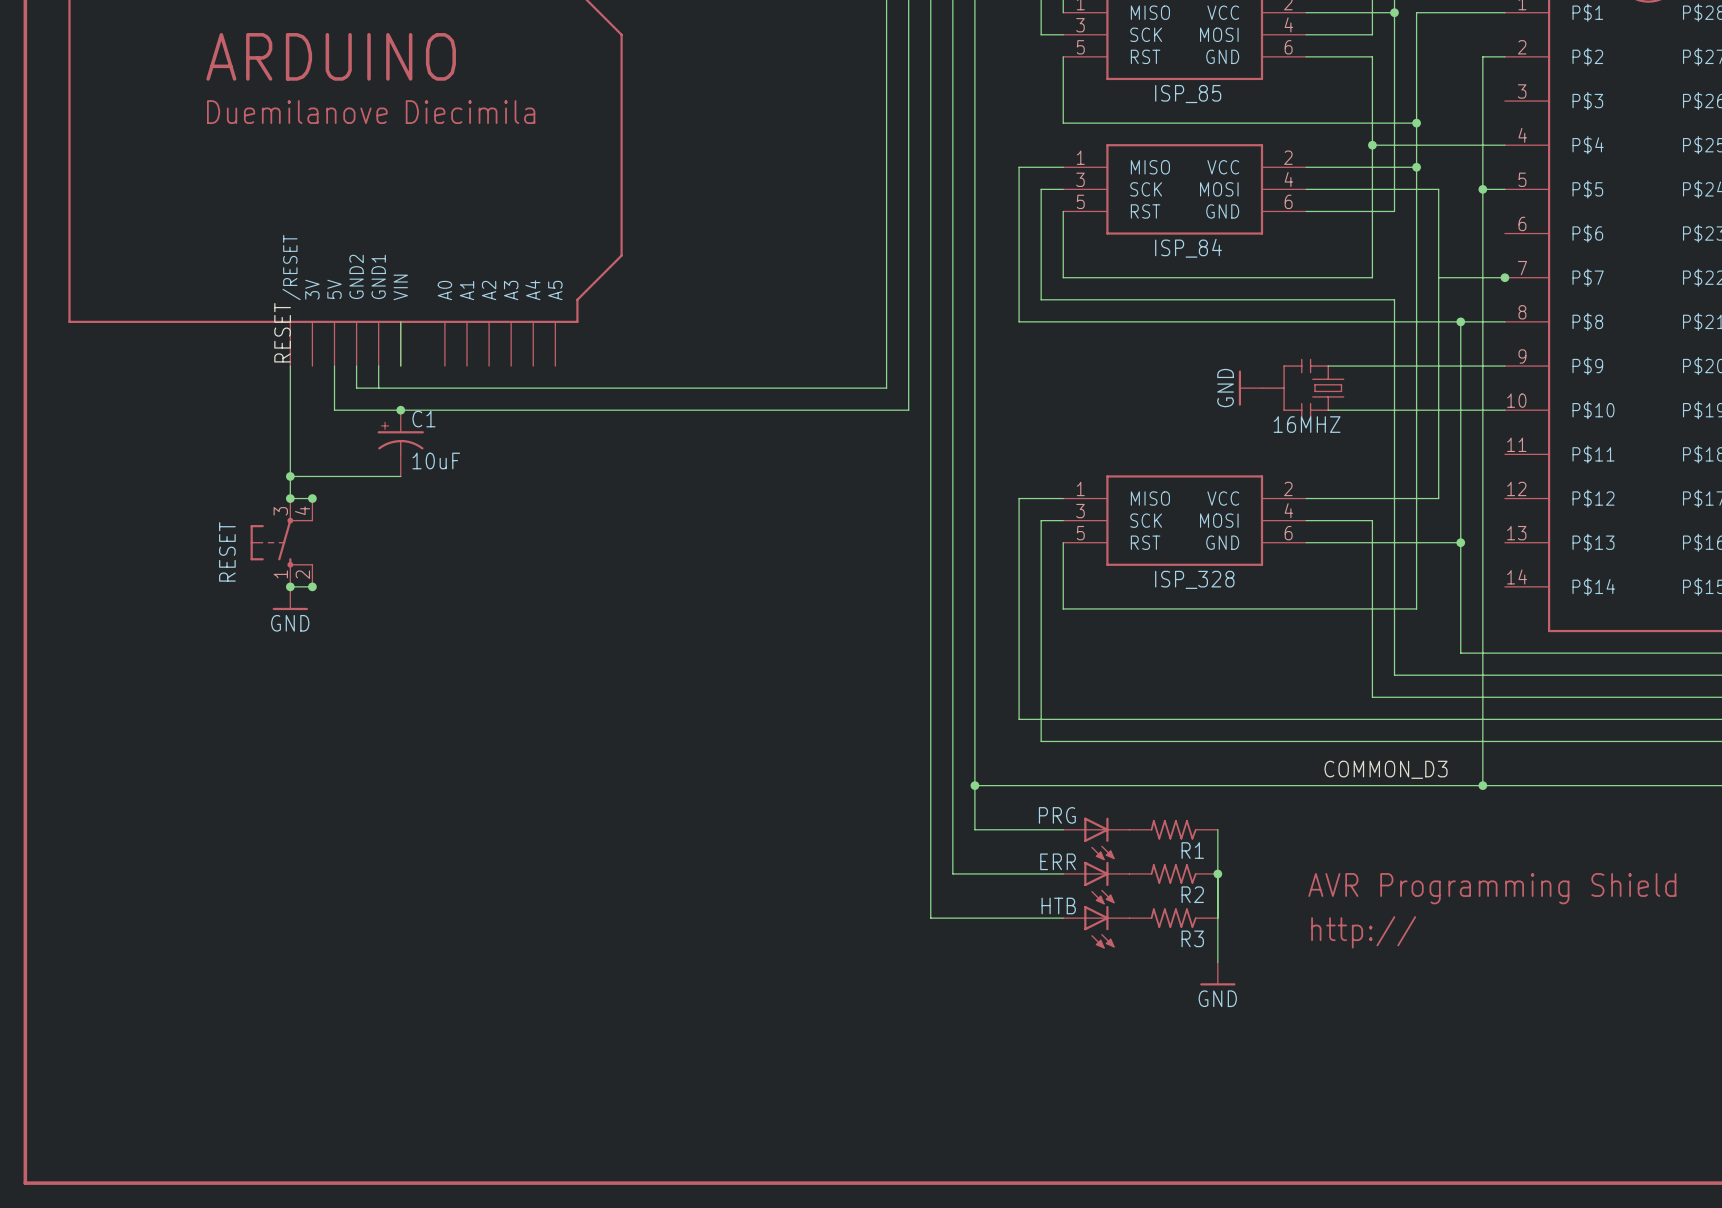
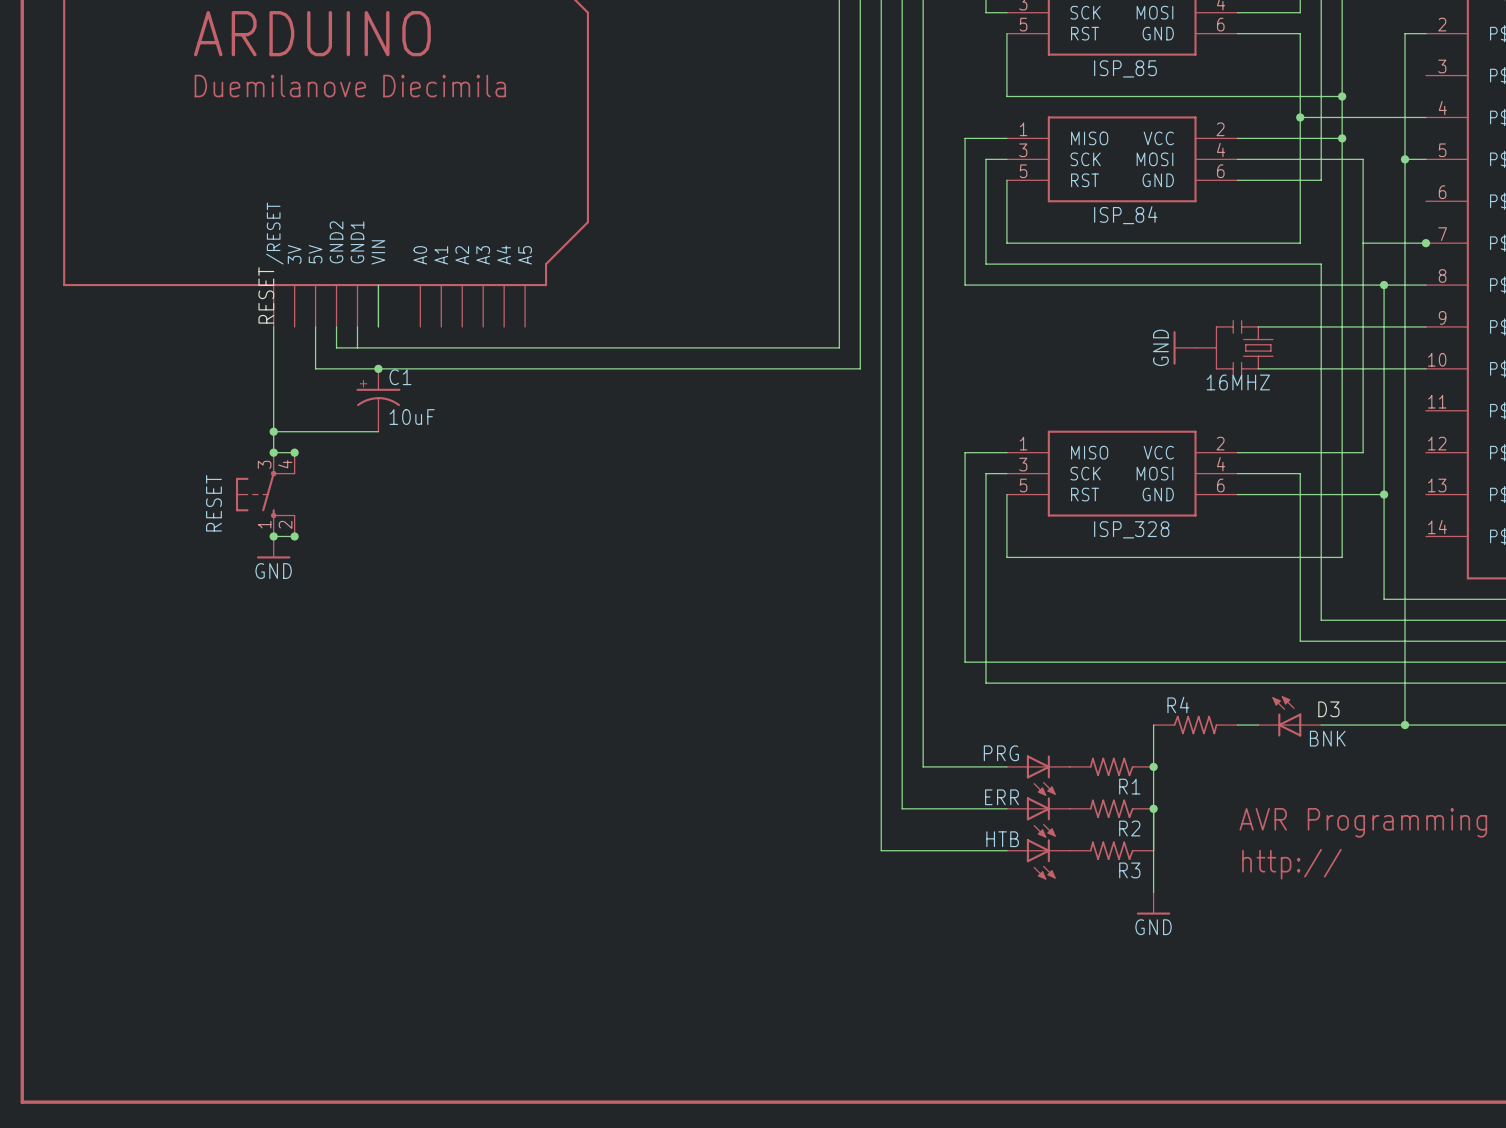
label: COMMON_D3 (1386, 769) -> none
label: none -> D3 (1328, 709)
BNK: none -> (1289, 716)
wire: (974, 785) (1306, 785) -> none
junction: (974, 785) -> none
wire: none -> (1153, 725) (1153, 766)
R4: none -> (1195, 725)
junction: none -> (1153, 766)

